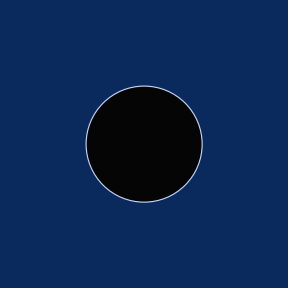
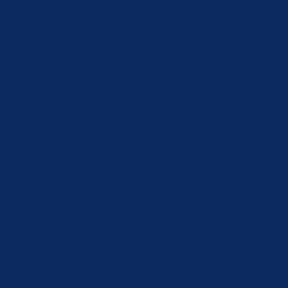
part: (144, 144) -> none

